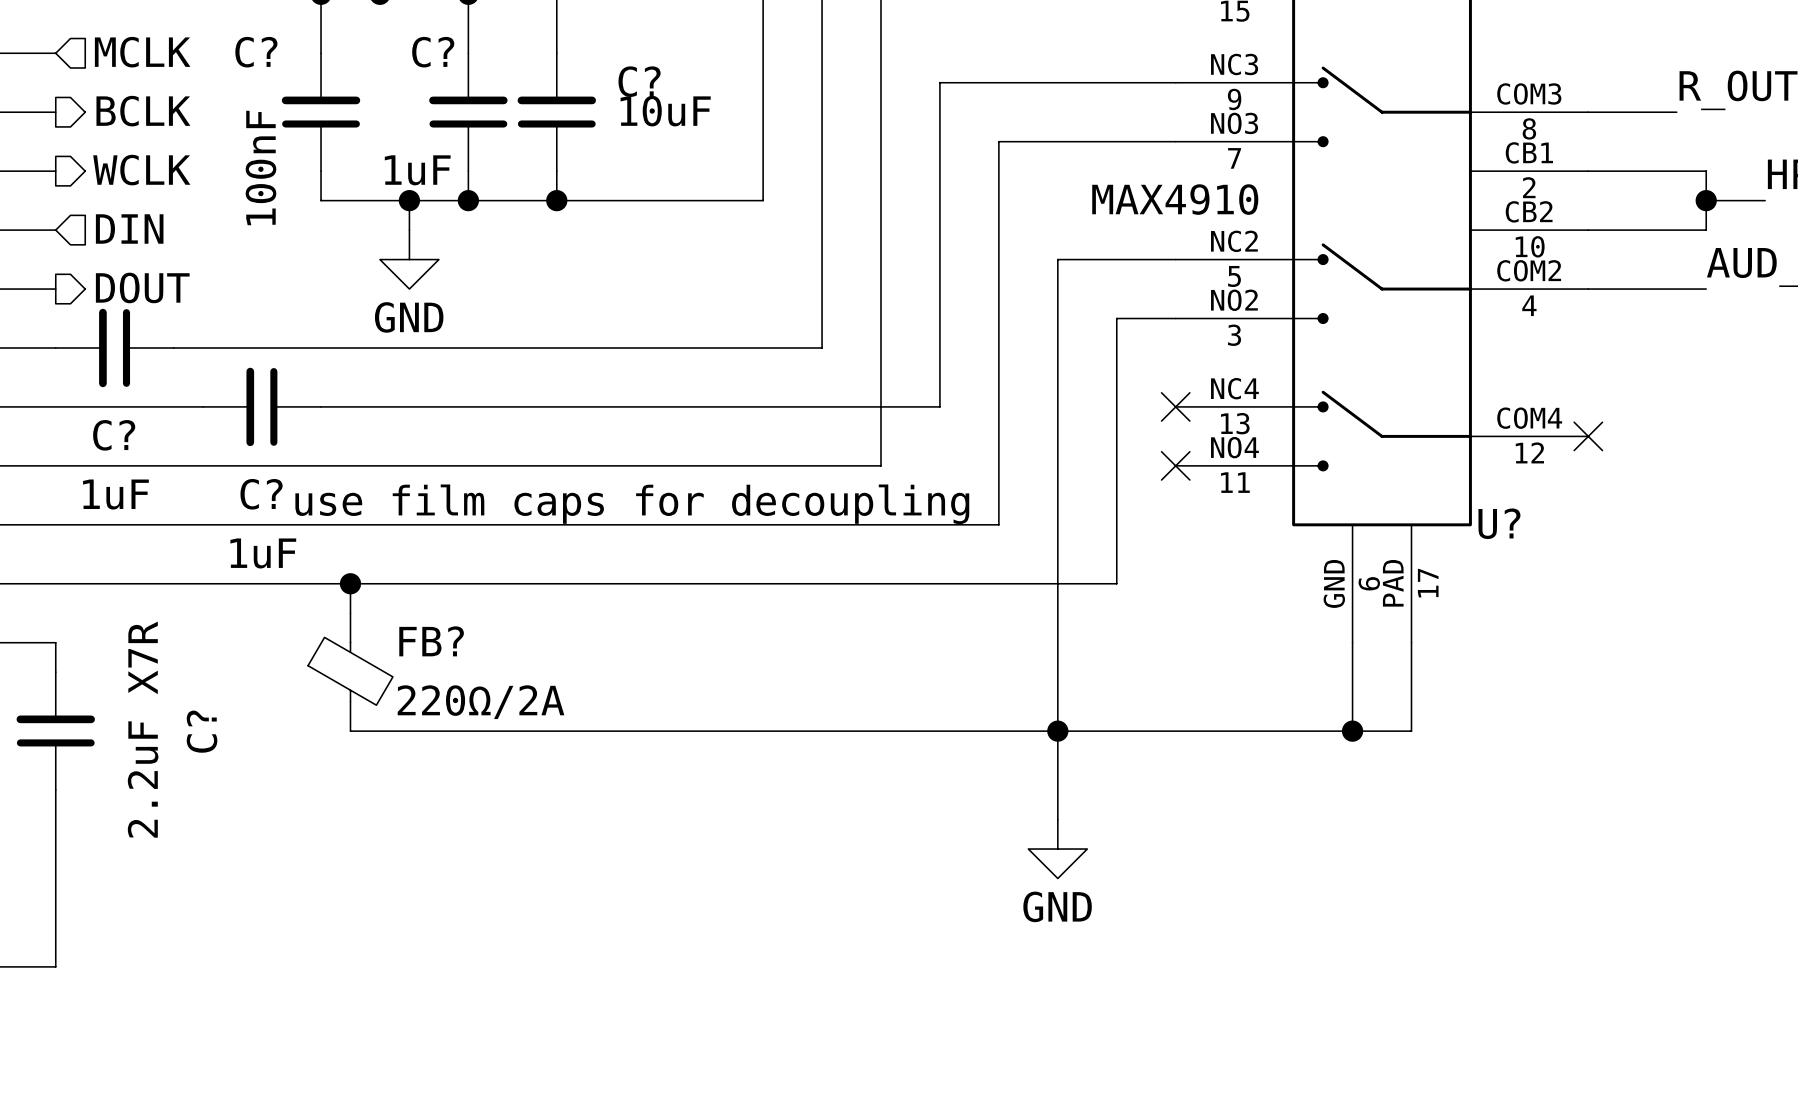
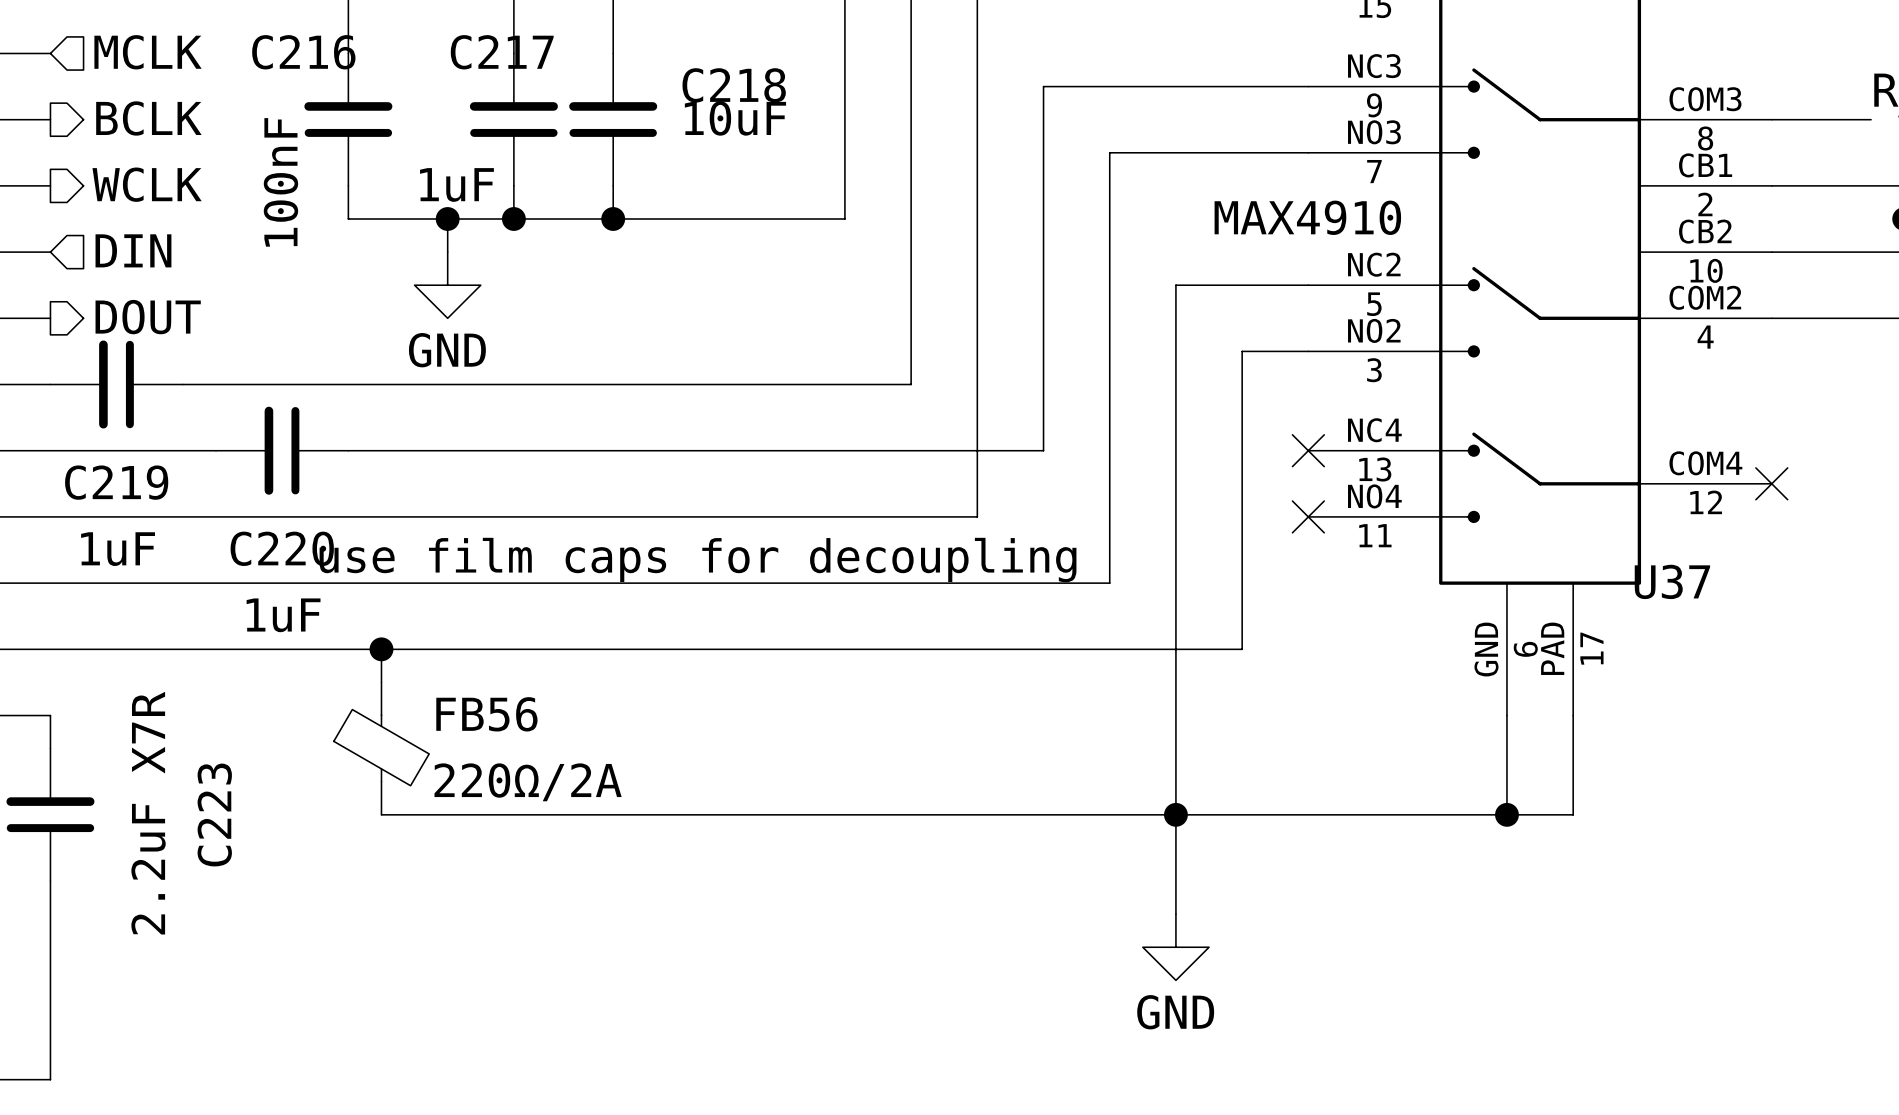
C? name: C? (256, 52) -> C216 (303, 52)
C? name: C? (433, 52) -> C217 (502, 52)
C? name: C? (639, 81) -> C218 (734, 85)
C? name: C? (114, 435) -> C219 (116, 482)
C? name: C? (261, 494) -> C220 (282, 548)
U? name: U? (1499, 523) -> U37 (1672, 581)
FB? name: FB? (431, 641) -> FB56 (486, 714)
C? name: C? (202, 731) -> C223 (214, 815)

